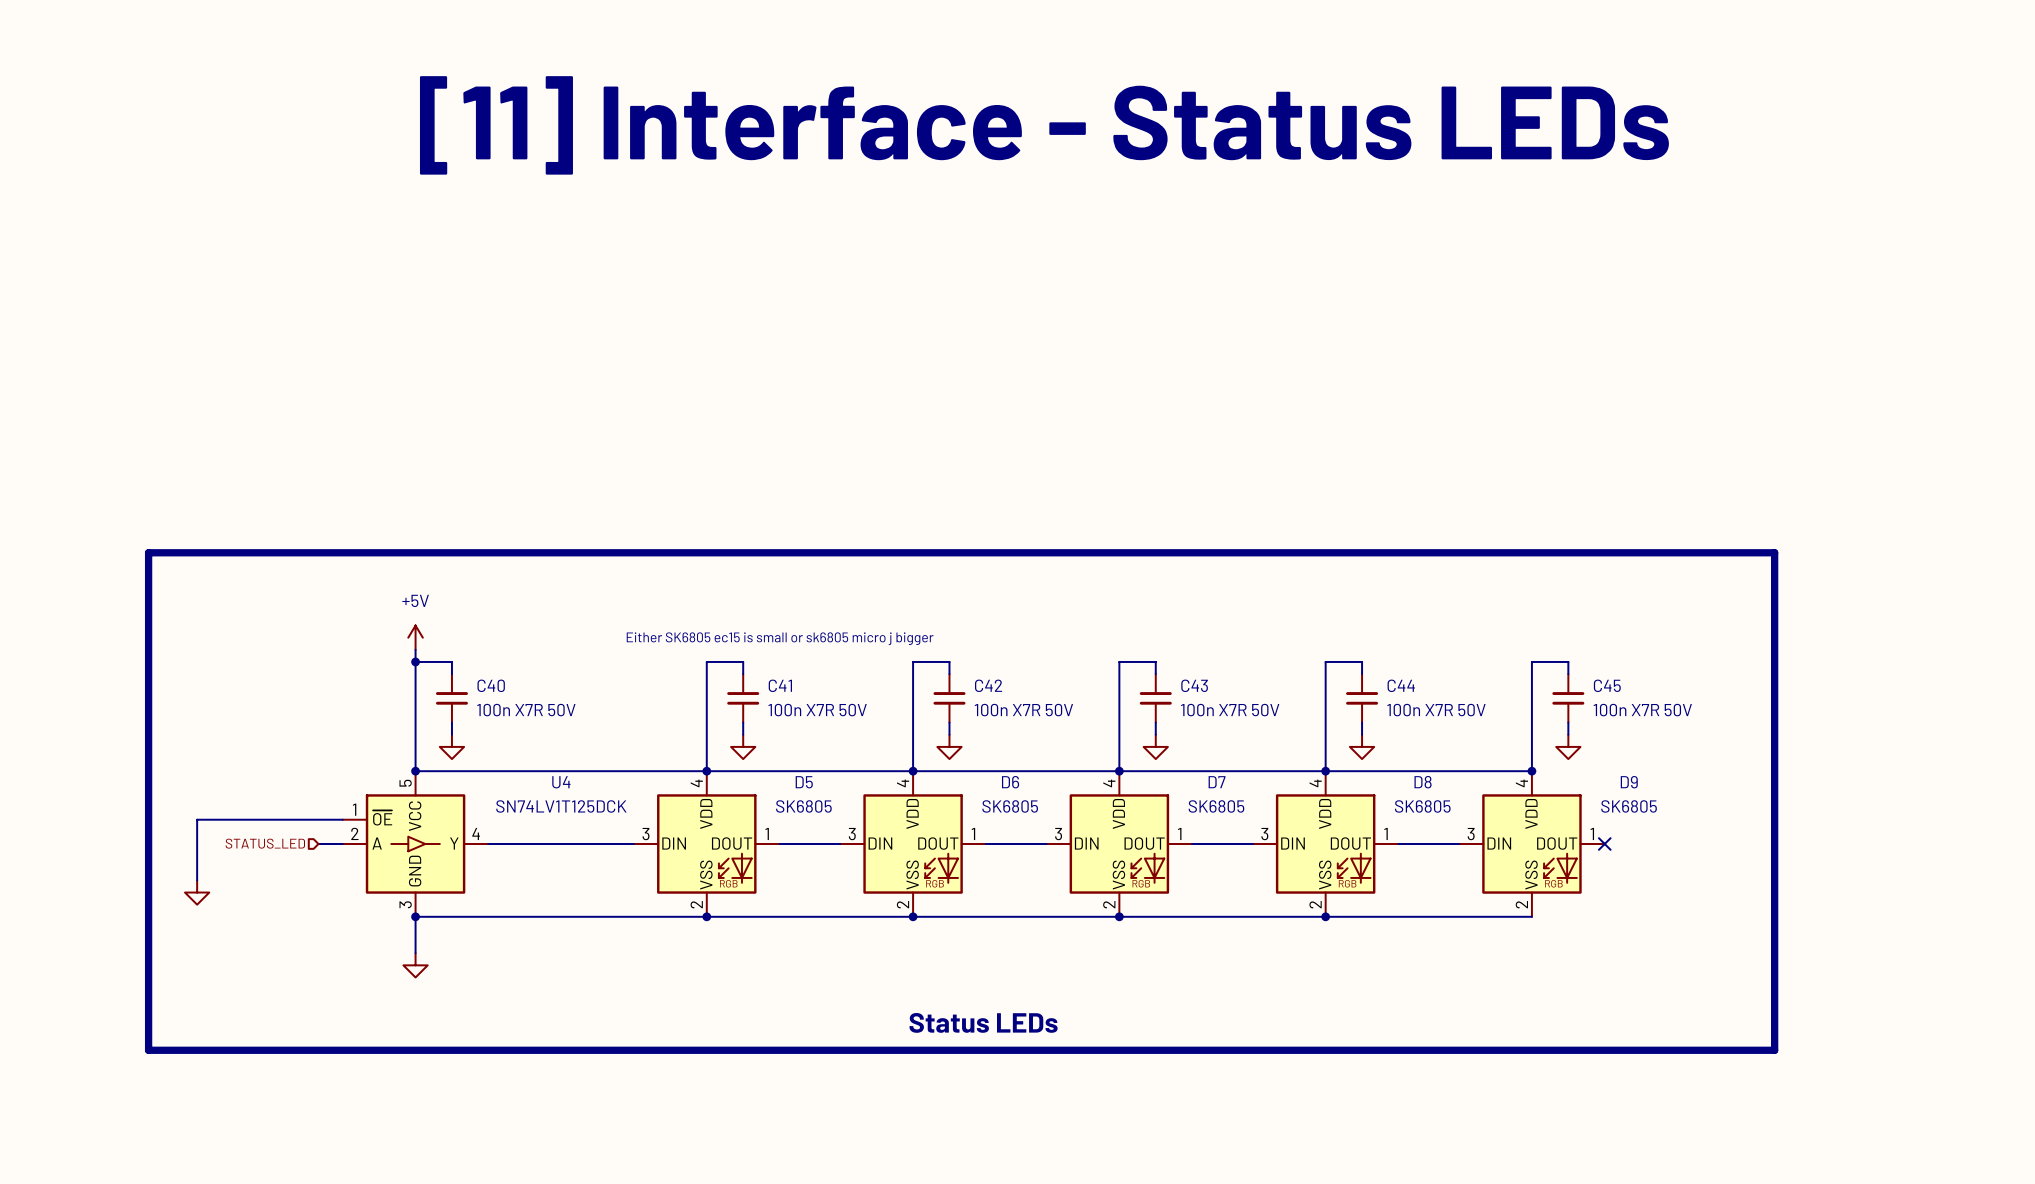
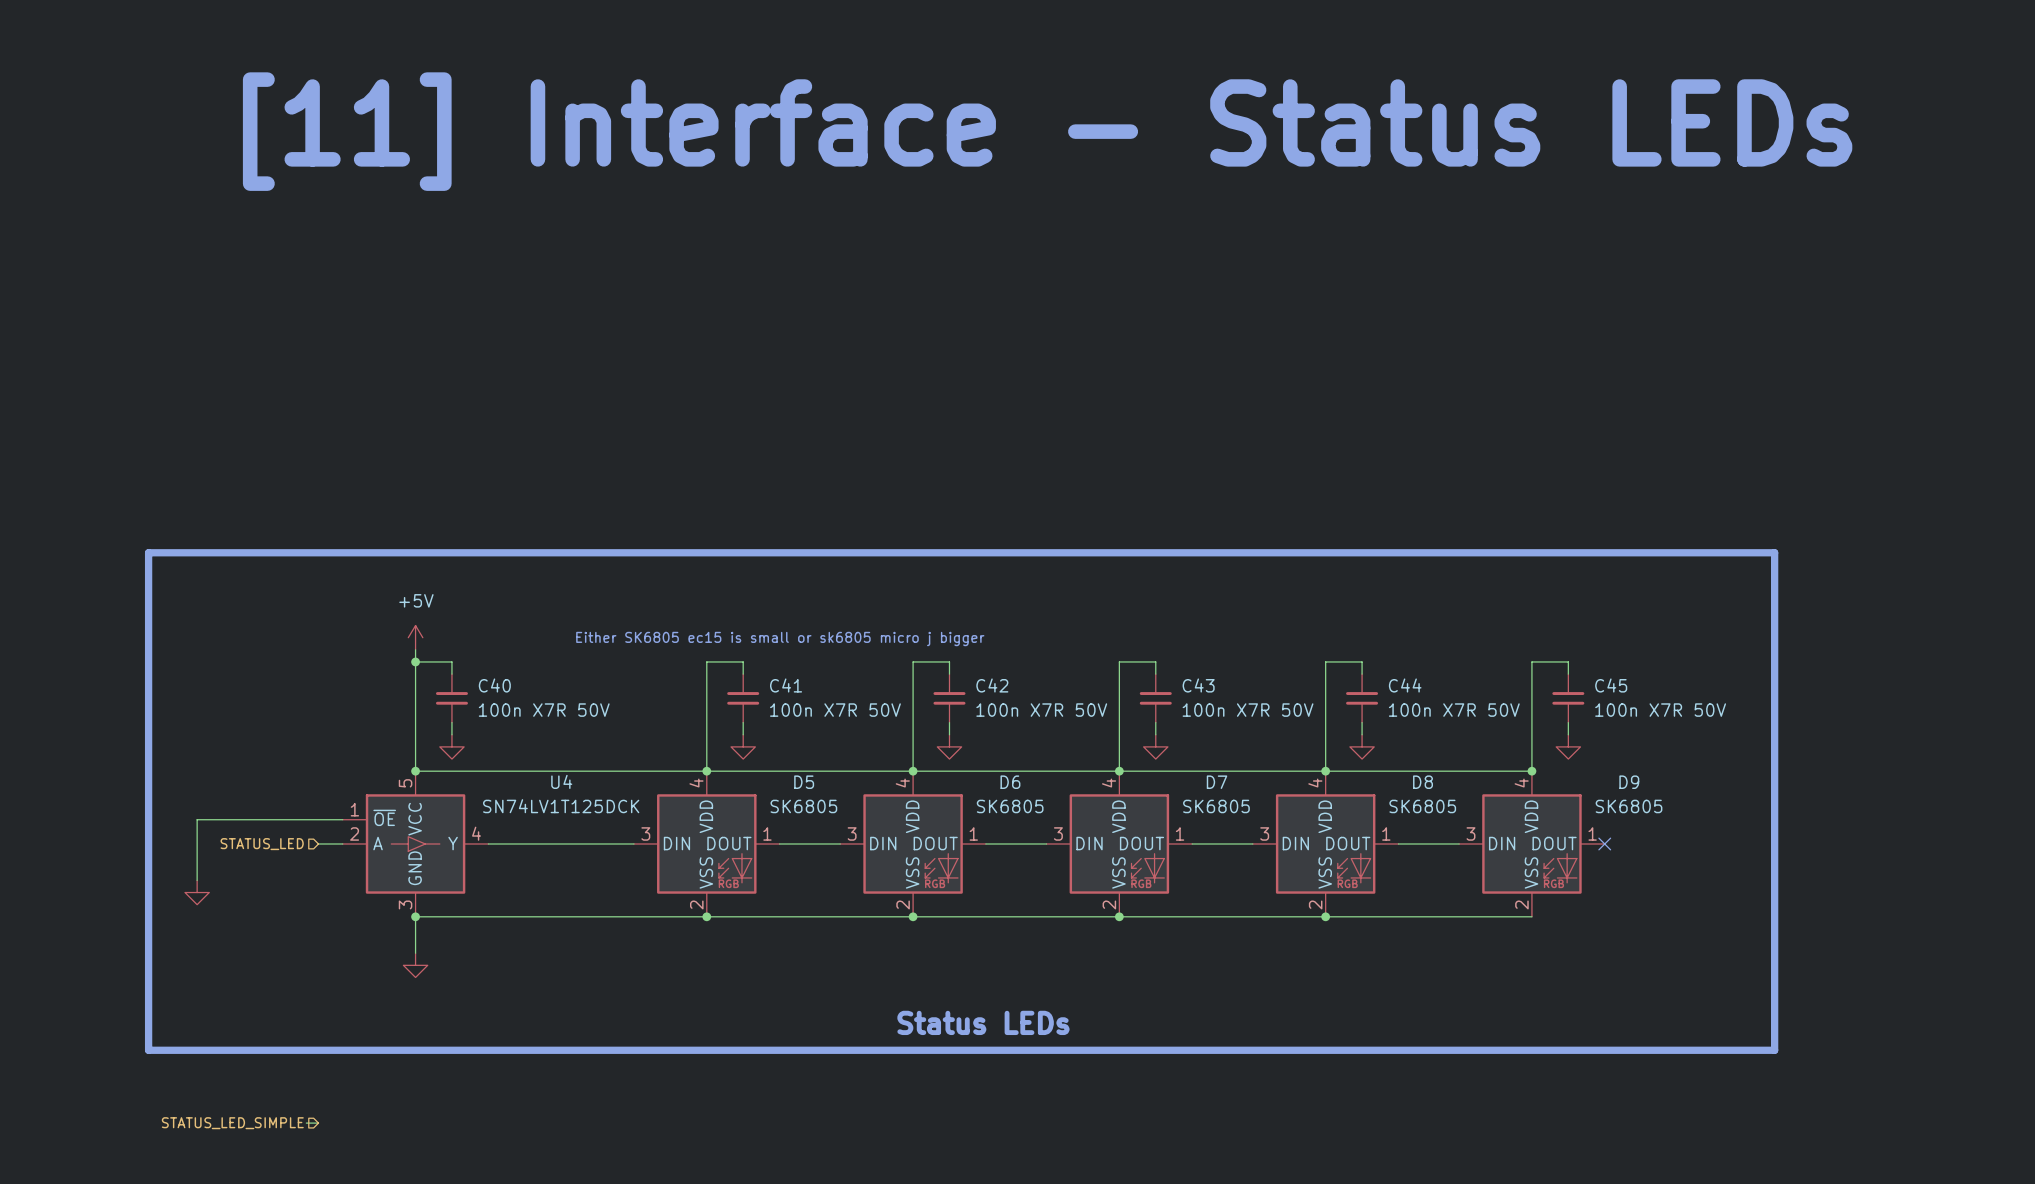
hierarchical label: none -> STATUS_LED_SIMPLE (232, 1123)
wire: none -> (306, 1123) (318, 1123)

